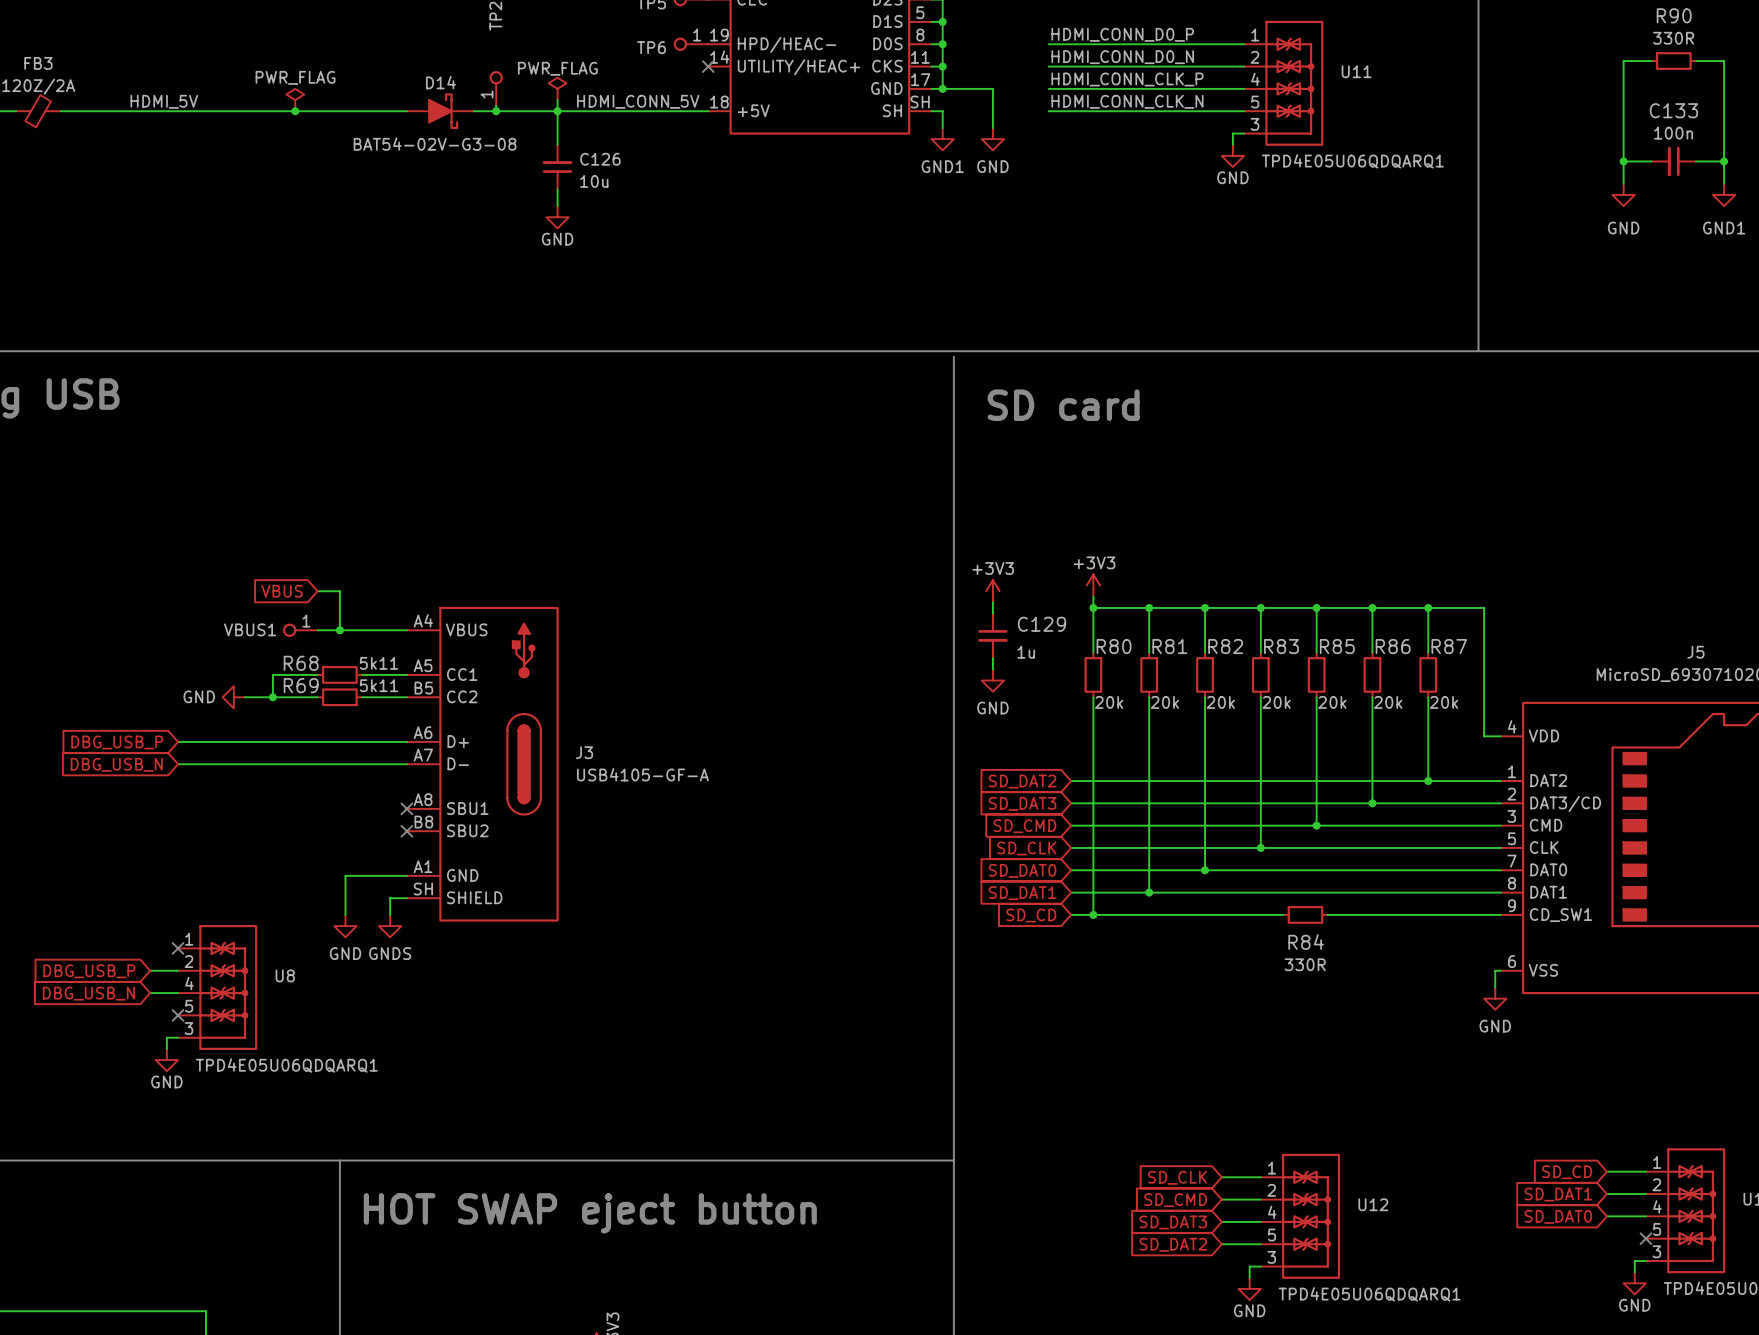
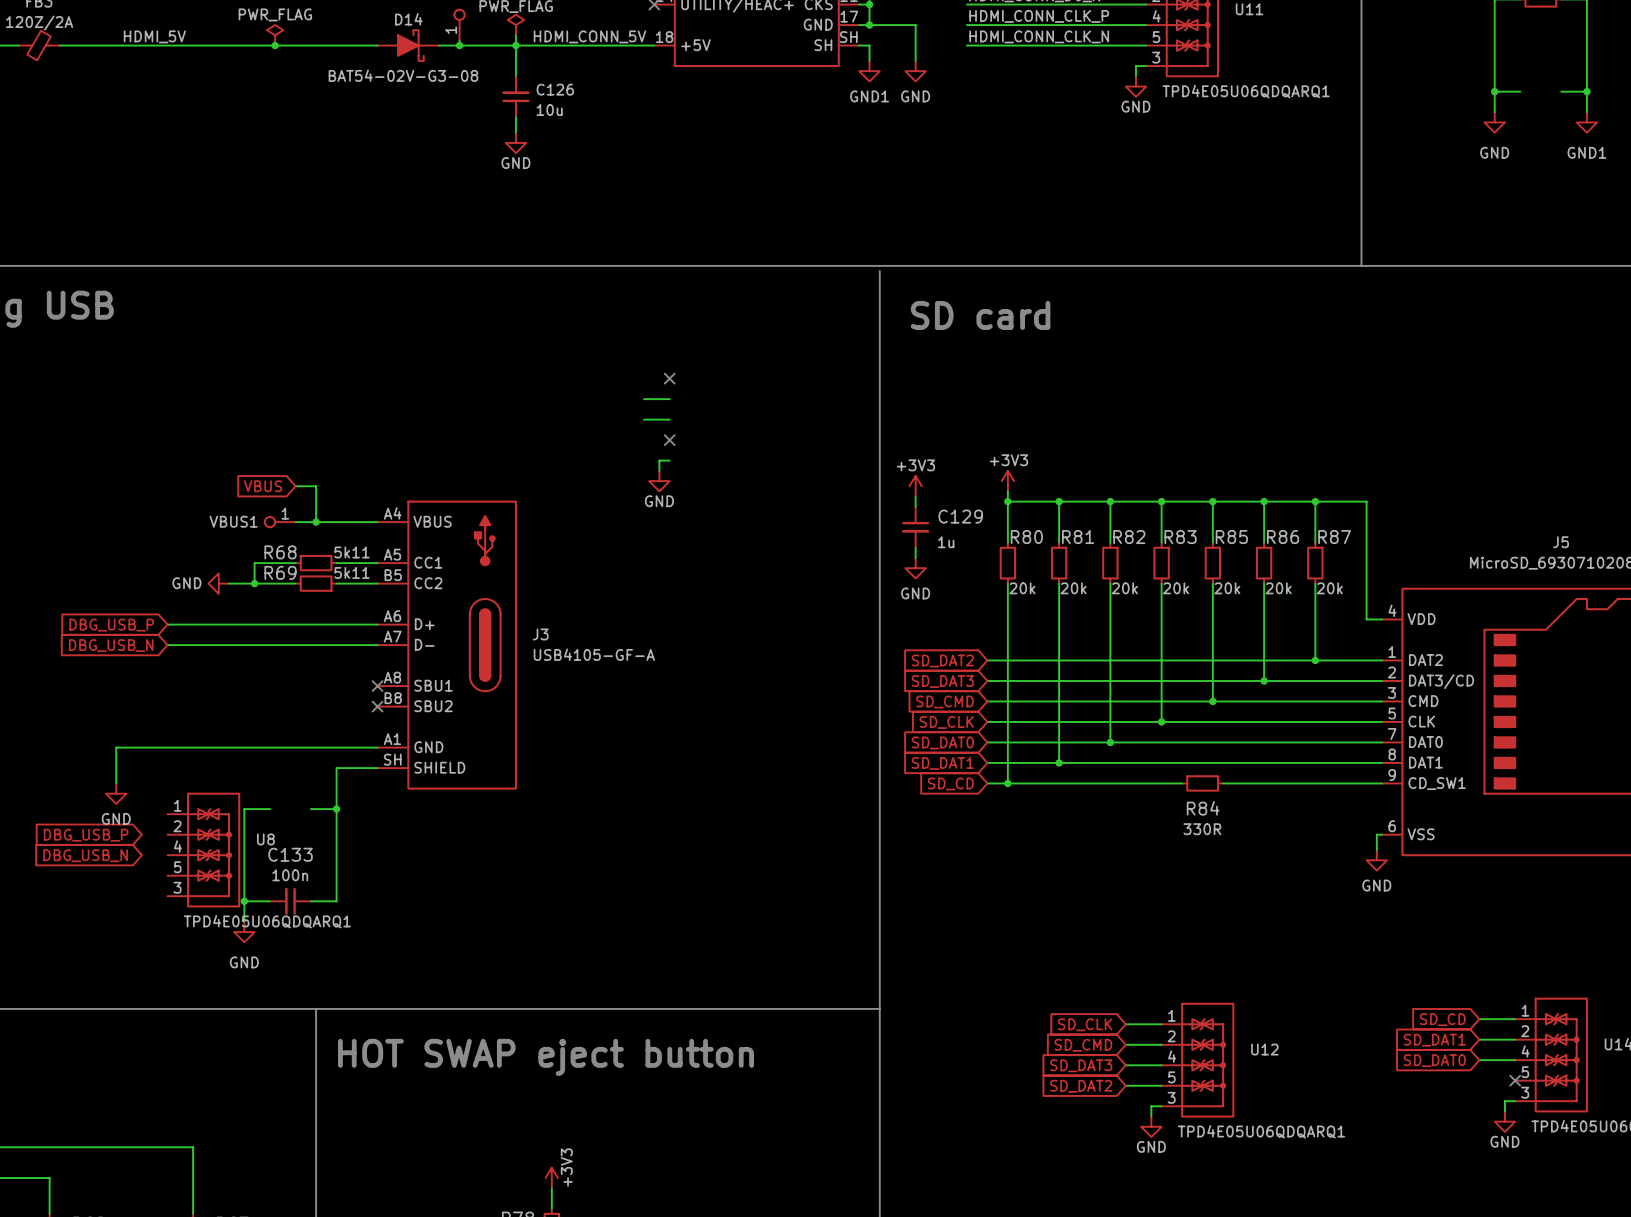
C133 position: (1673, 161) -> (290, 901)
no-connect mark: none -> (669, 378)
wire: none -> (644, 399) (669, 399)
wire: none -> (644, 419) (669, 419)
no-connect mark: none -> (669, 440)
wire: none -> (669, 460) (659, 460) (659, 470)
power symbol: none -> GND (659, 481)
wire: (345, 875) (345, 914) -> (321, 747) (116, 747) (116, 783)
wire: (390, 898) (390, 914) -> (362, 768) (336, 768) (336, 901) (310, 901)
power symbol: none -> GND (116, 793)
power symbol: GND (345, 926) -> none
power symbol: GNDS (390, 926) -> none
wire: none -> (269, 809) (244, 809) (244, 921)
junction: none -> (336, 809)
no-connect mark: (178, 948) -> none
wire: (150, 970) (178, 970) -> (310, 809) (336, 809)
wire: (150, 993) (178, 993) -> (244, 901) (269, 901)
no-connect mark: (178, 1015) -> none
wire: (178, 1037) (166, 1037) (166, 1048) -> none
junction: none -> (244, 901)
power symbol: GND (166, 1060) -> none
power symbol: none -> GND (244, 932)

